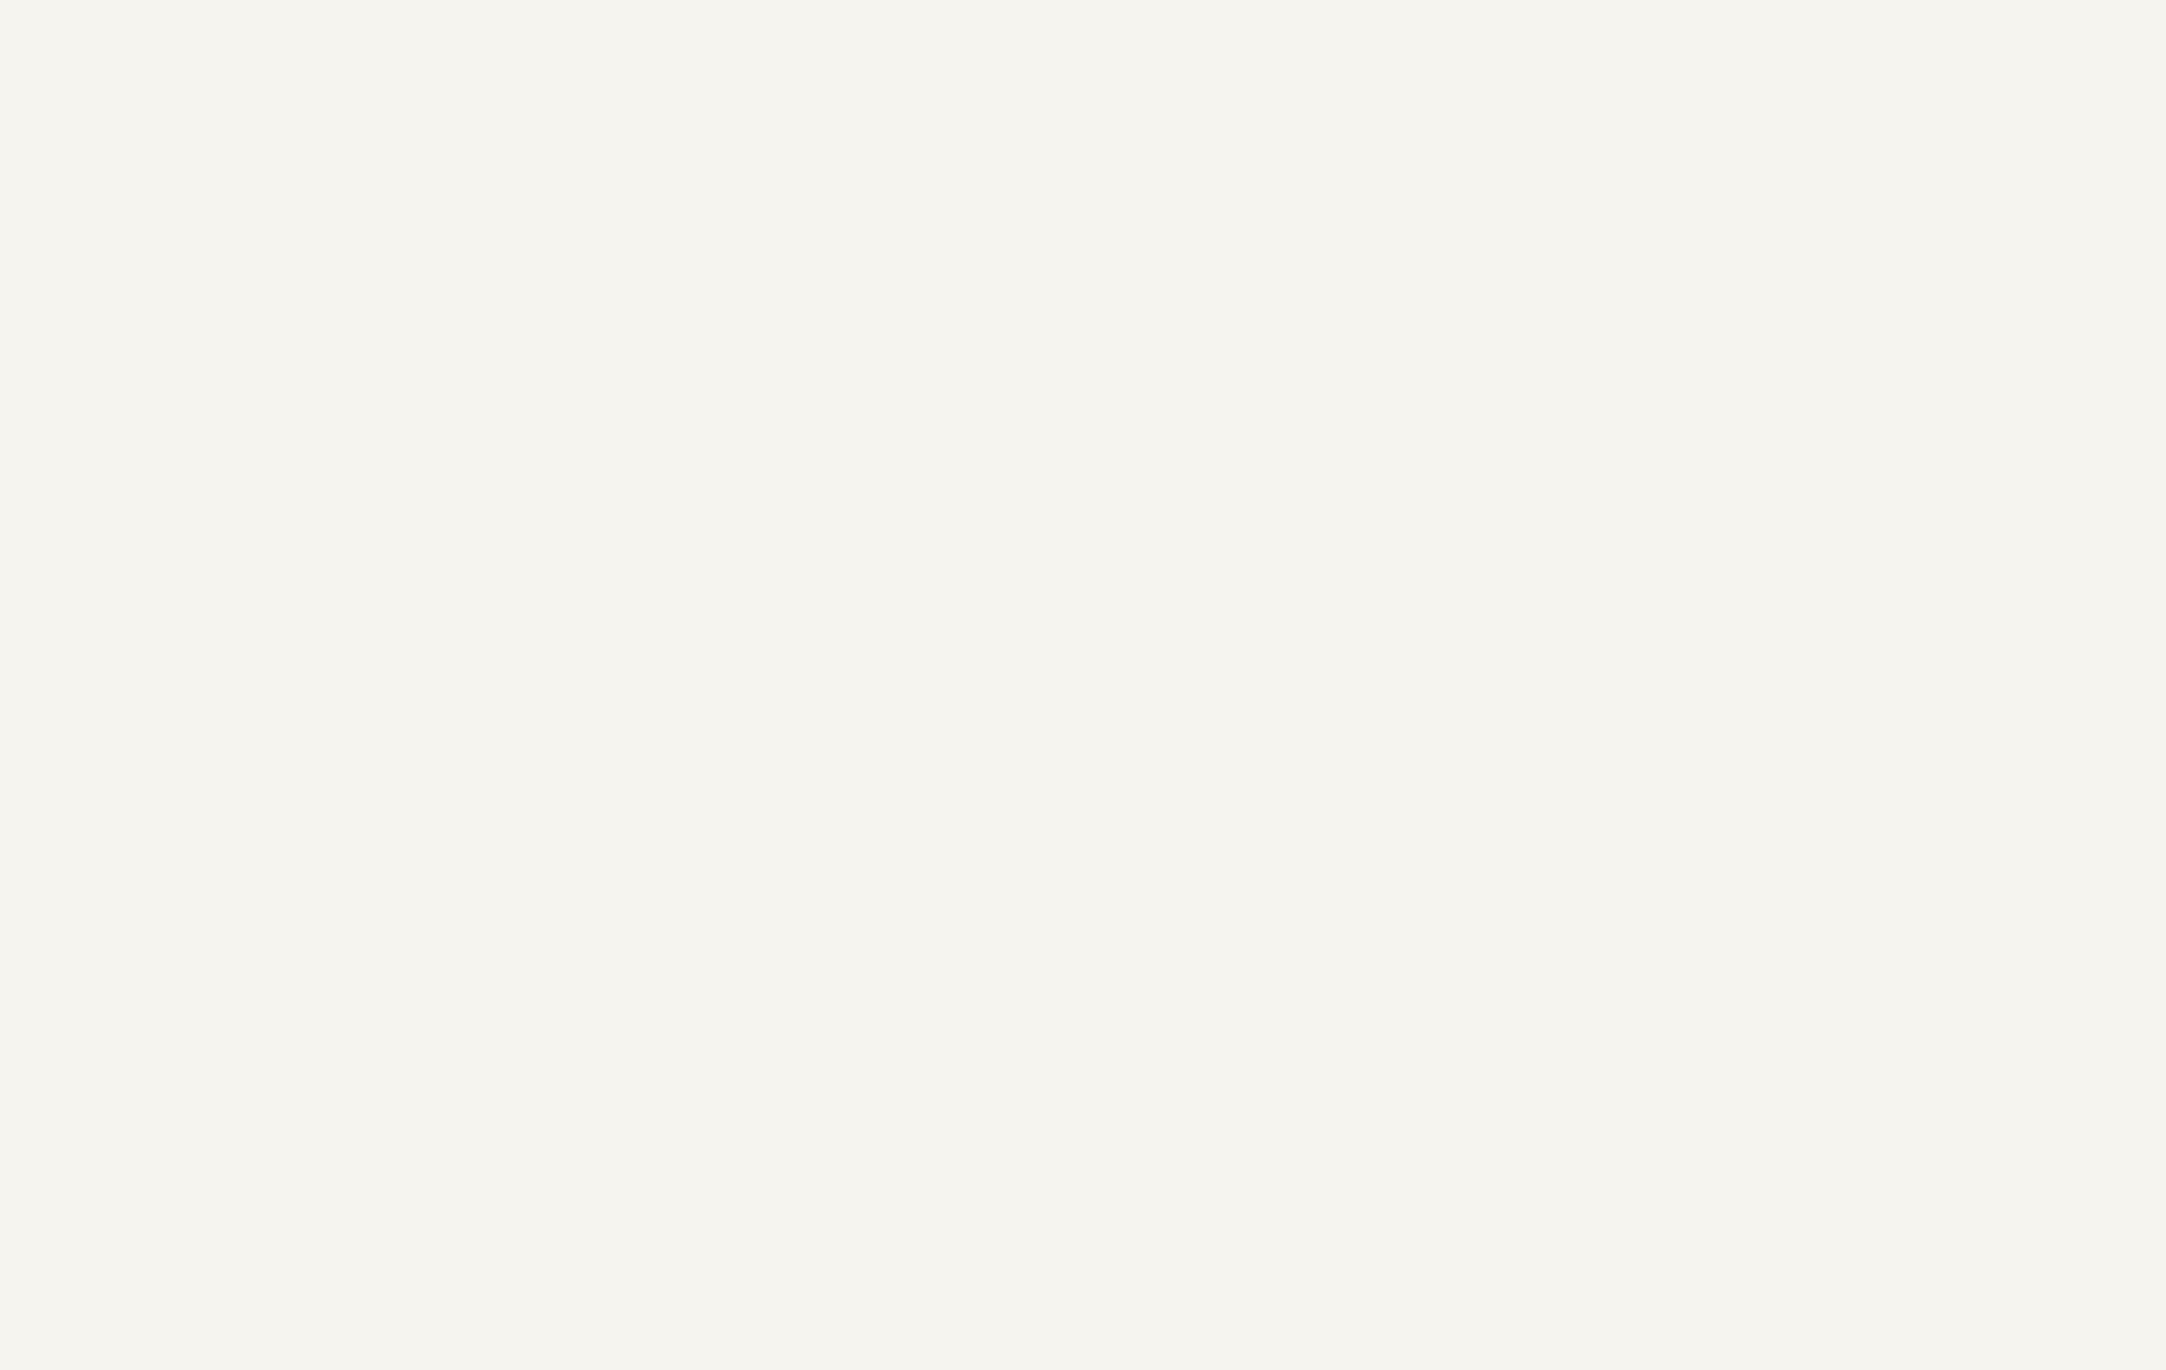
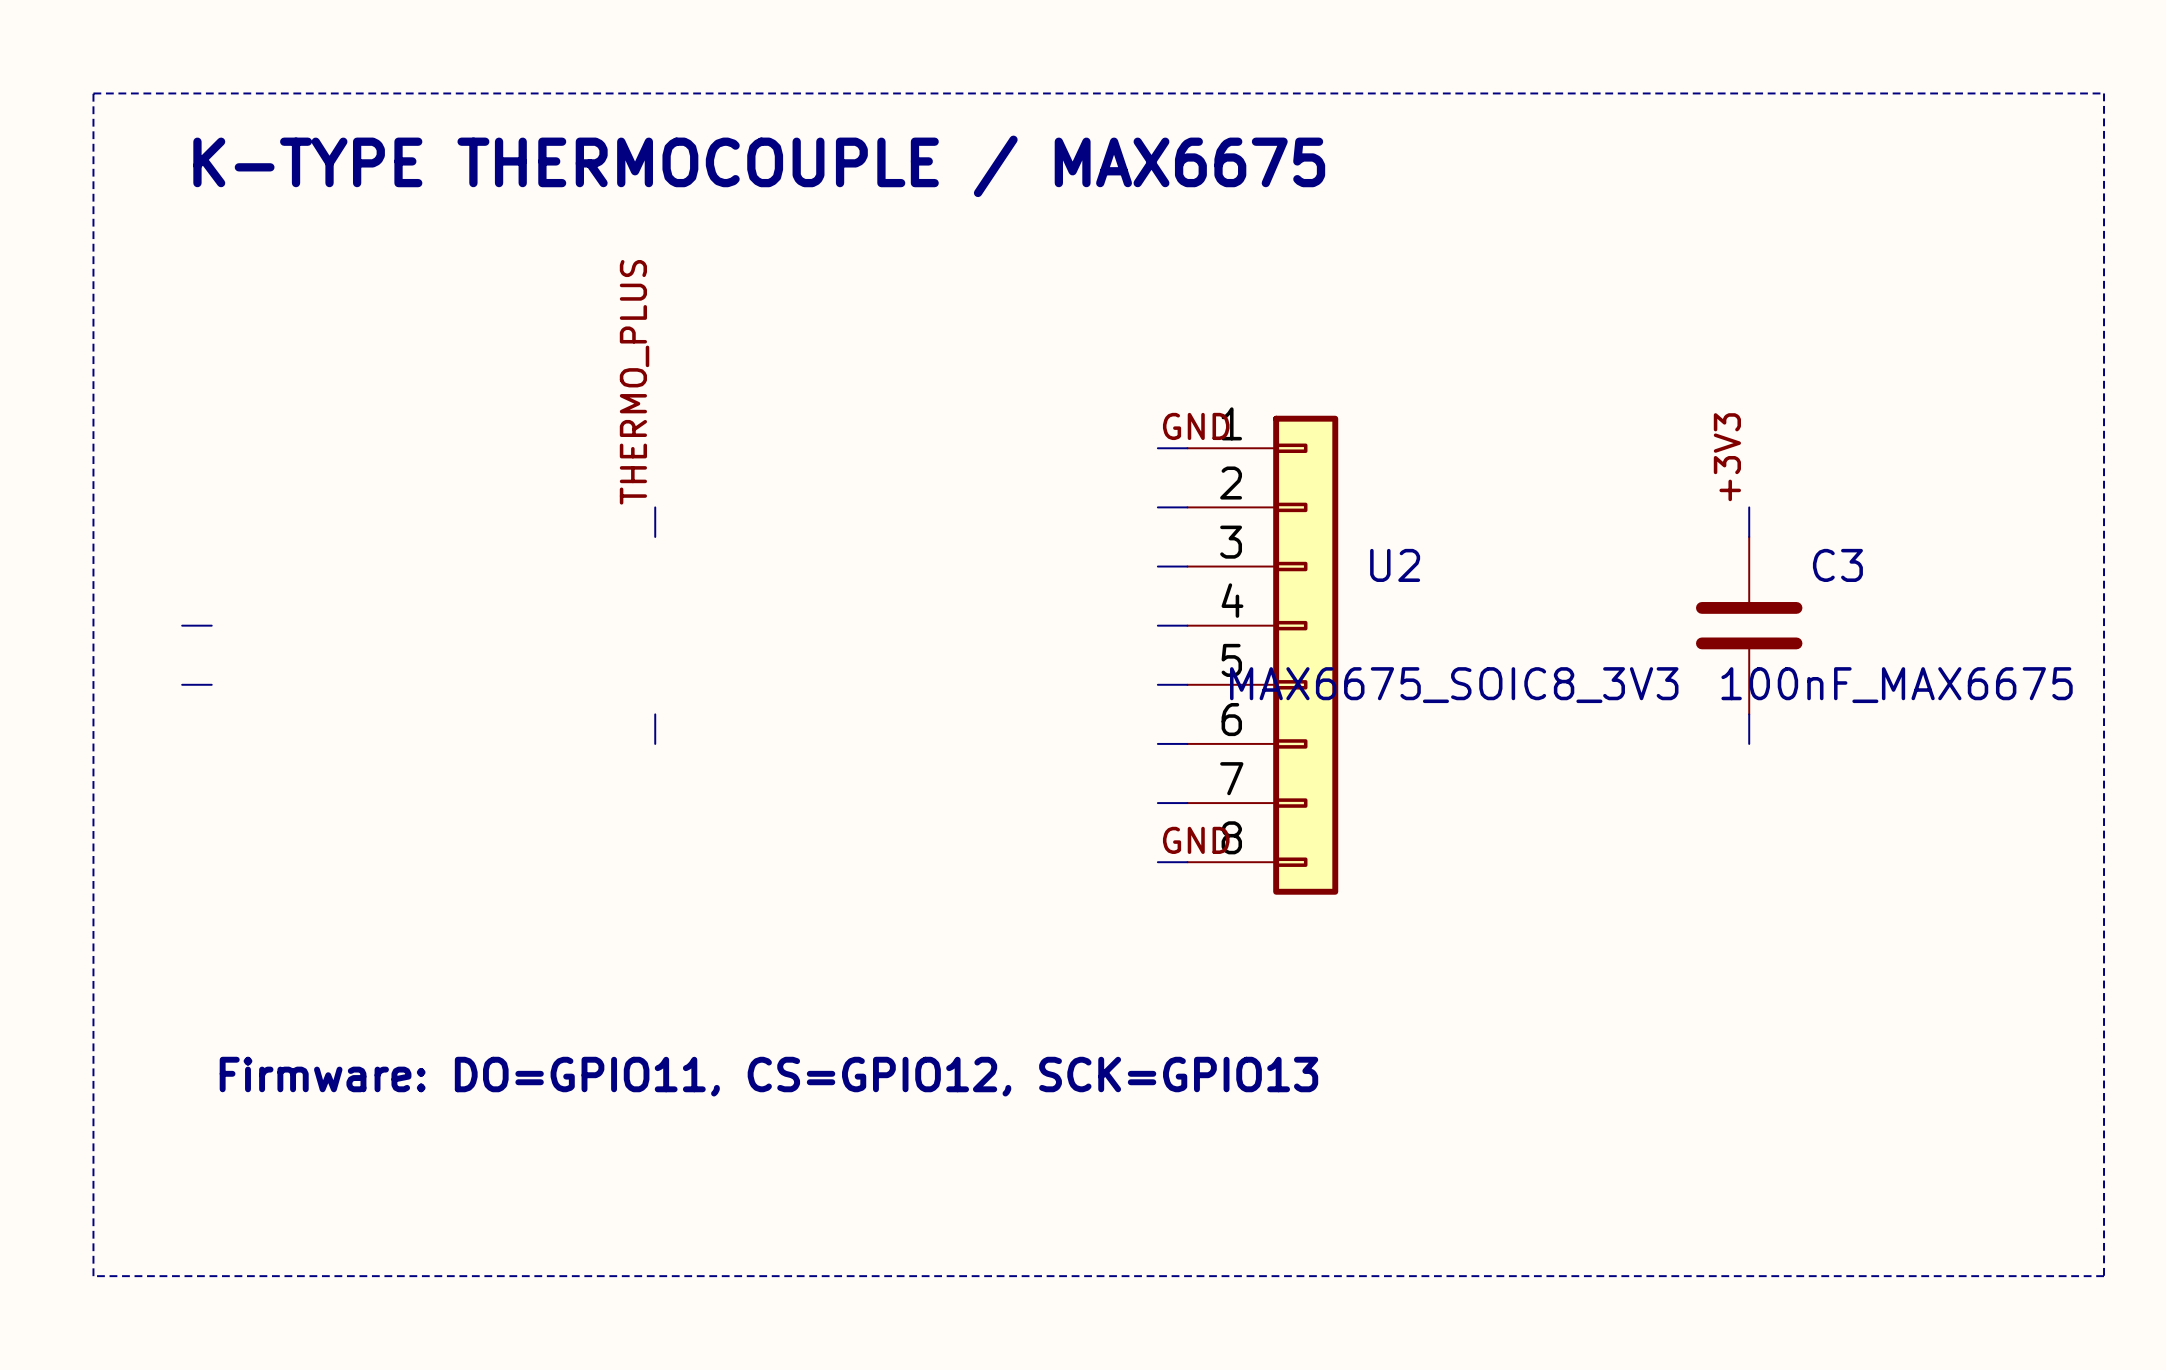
line: none -> (93, 93) (93, 1276) (2104, 1276) (2104, 93) (93, 93)
text: none -> K-TYPE THERMOCOUPLE / MAX6675 (759, 166)
label: none -> THERMO_PLUS (634, 382)
label: none -> GND (1196, 426)
wire: none -> (1157, 448) (1187, 448)
label: none -> +3V3 (1727, 457)
wire: none -> (655, 507) (655, 536)
wire: none -> (1157, 507) (1187, 507)
wire: none -> (1749, 507) (1749, 536)
wire: none -> (1157, 566) (1187, 566)
wire: none -> (182, 625) (211, 625)
wire: none -> (1157, 625) (1187, 625)
C3: none -> 100nF_MAX6675 (1749, 625)
U2: none -> MAX6675_SOIC8_3V3 (1262, 655)
wire: none -> (182, 684) (211, 684)
wire: none -> (1157, 684) (1187, 684)
wire: none -> (655, 714) (655, 743)
wire: none -> (1749, 714) (1749, 743)
wire: none -> (1157, 743) (1187, 743)
wire: none -> (1157, 803) (1187, 803)
label: none -> GND (1196, 840)
wire: none -> (1157, 862) (1187, 862)
text: none -> Firmware: DO=GPIO11, CS=GPIO12, SCK=GPIO13 (768, 1076)

